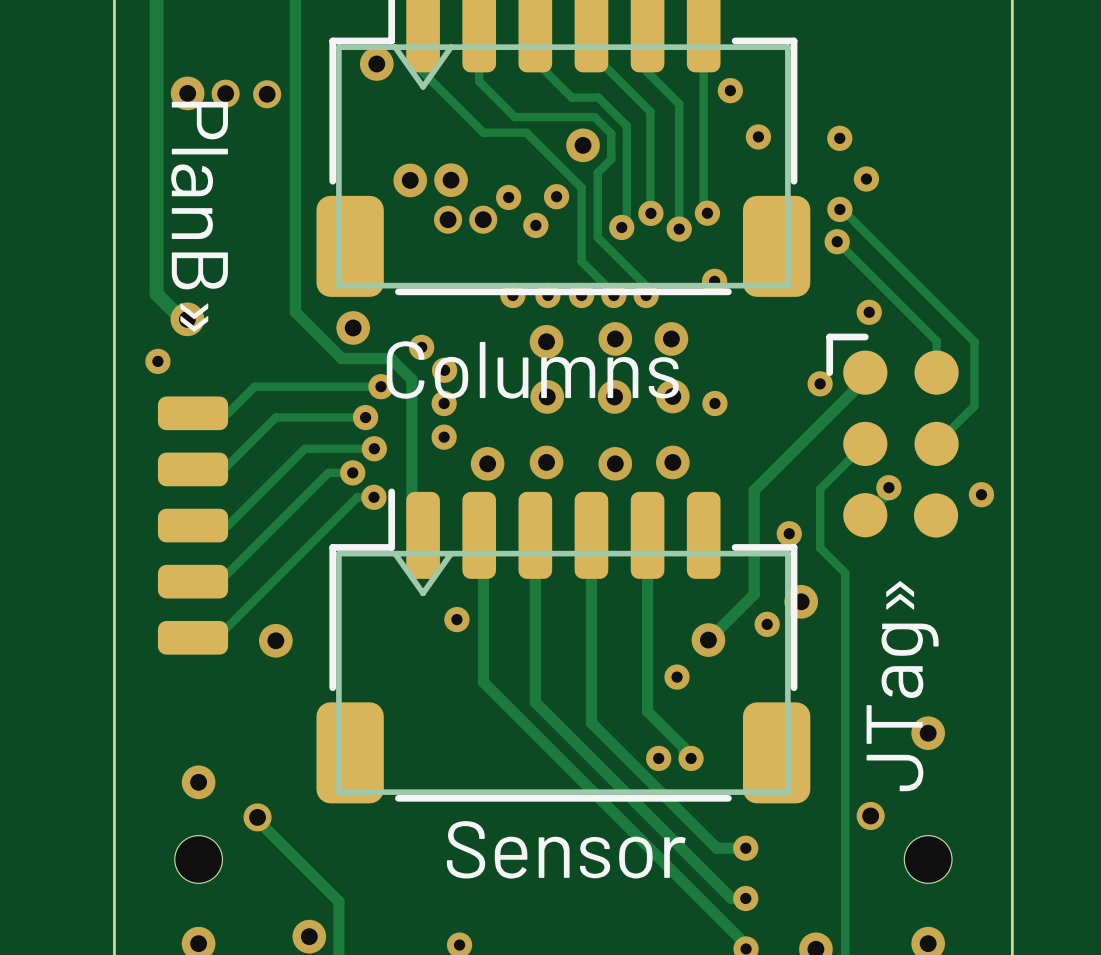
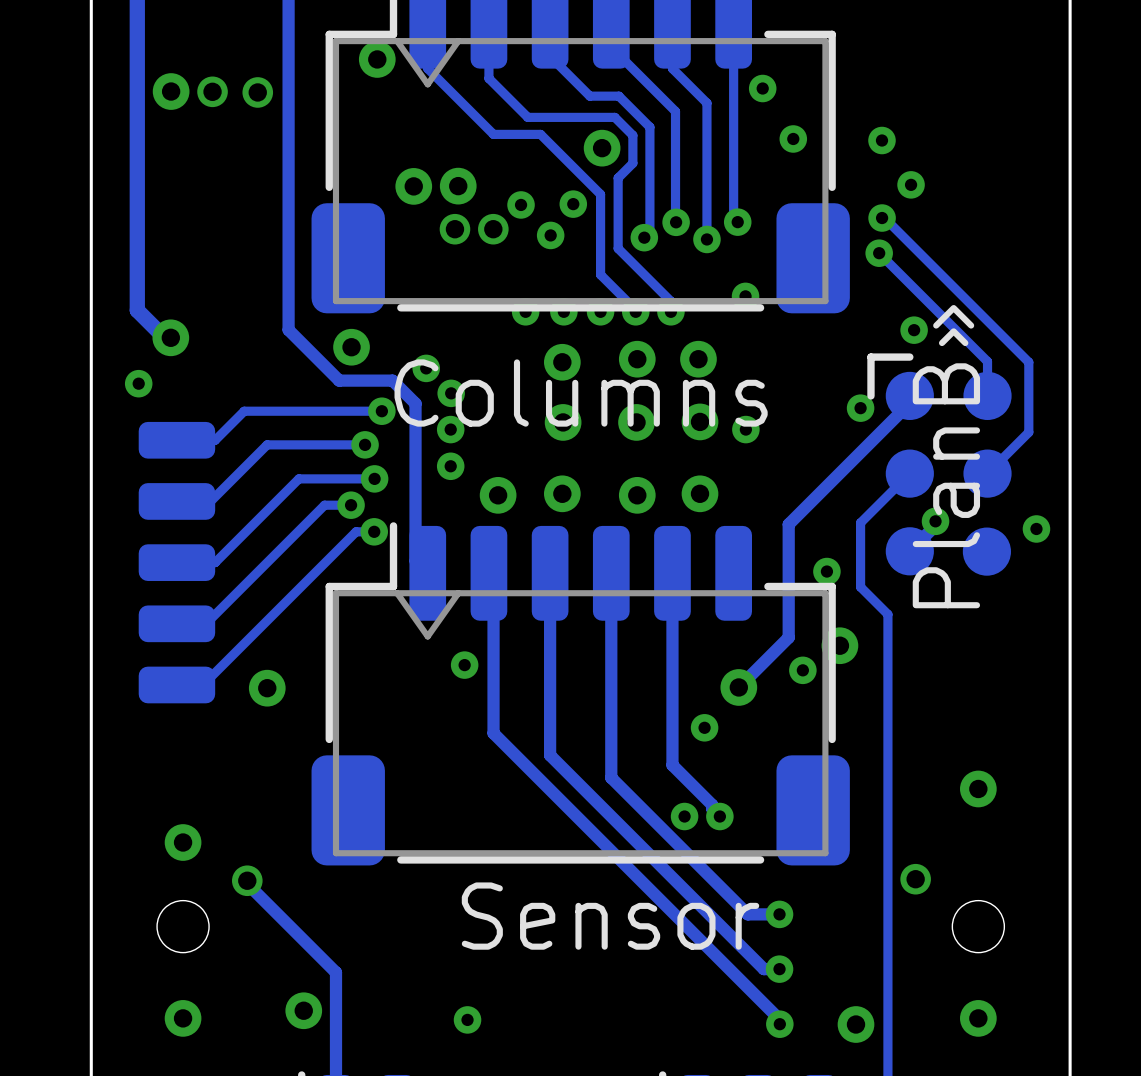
text rotation: 0° (199, 216) -> 180° (946, 456)
text position: PlanB» (199, 216) -> PlanB» (946, 456)
text: JTag» (902, 686) -> none

